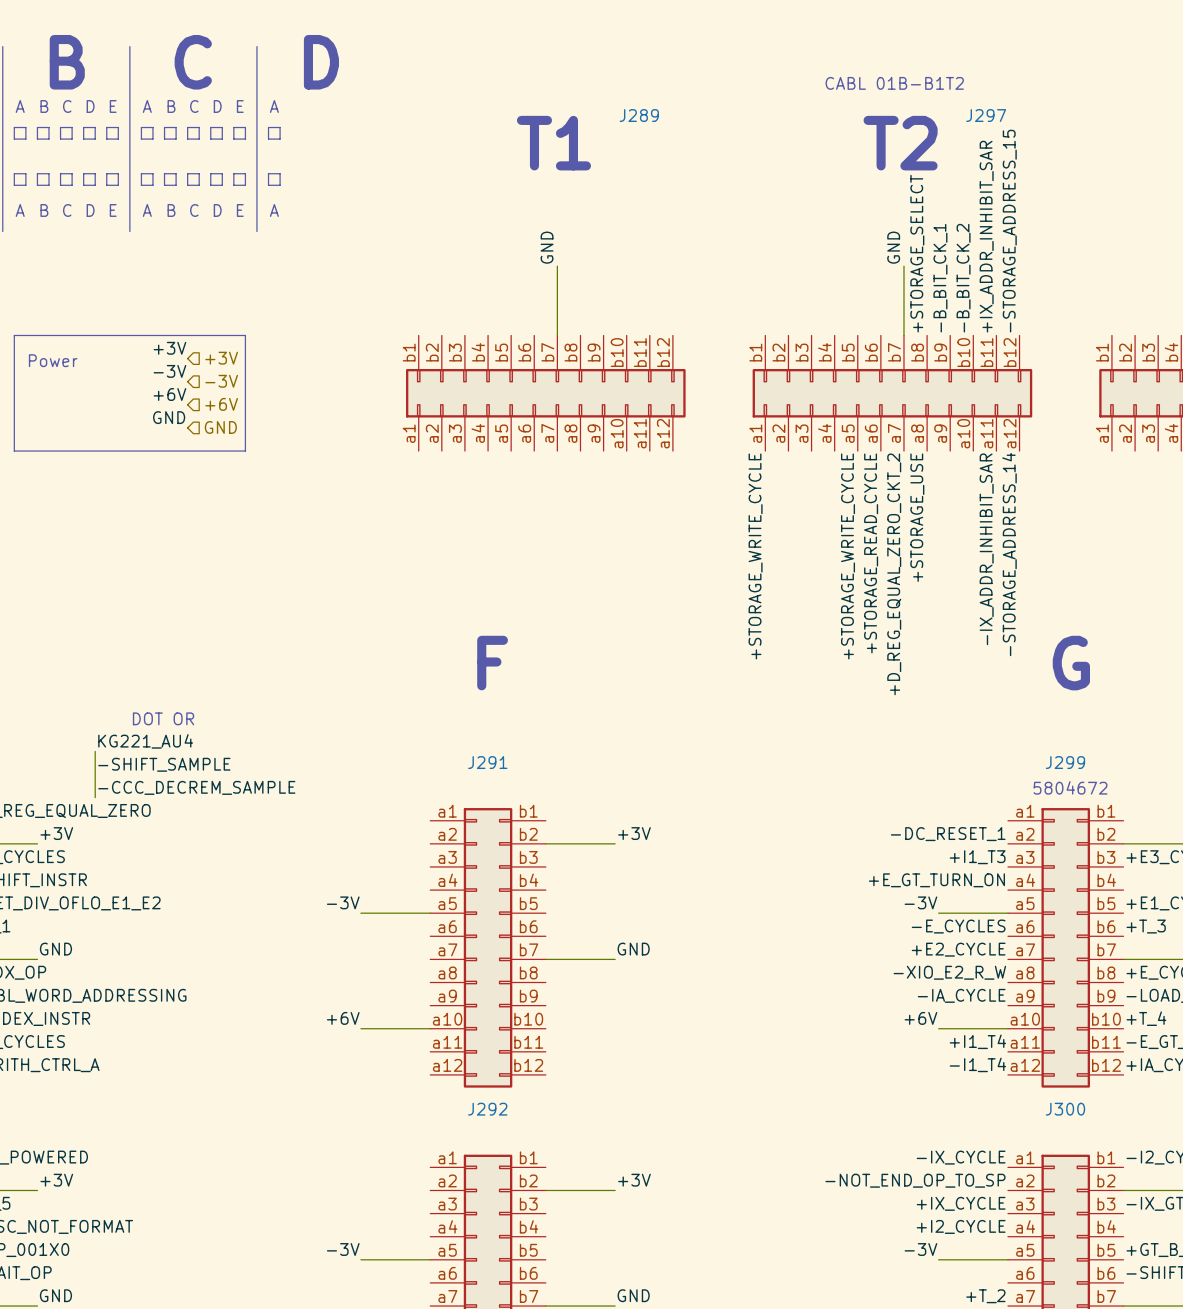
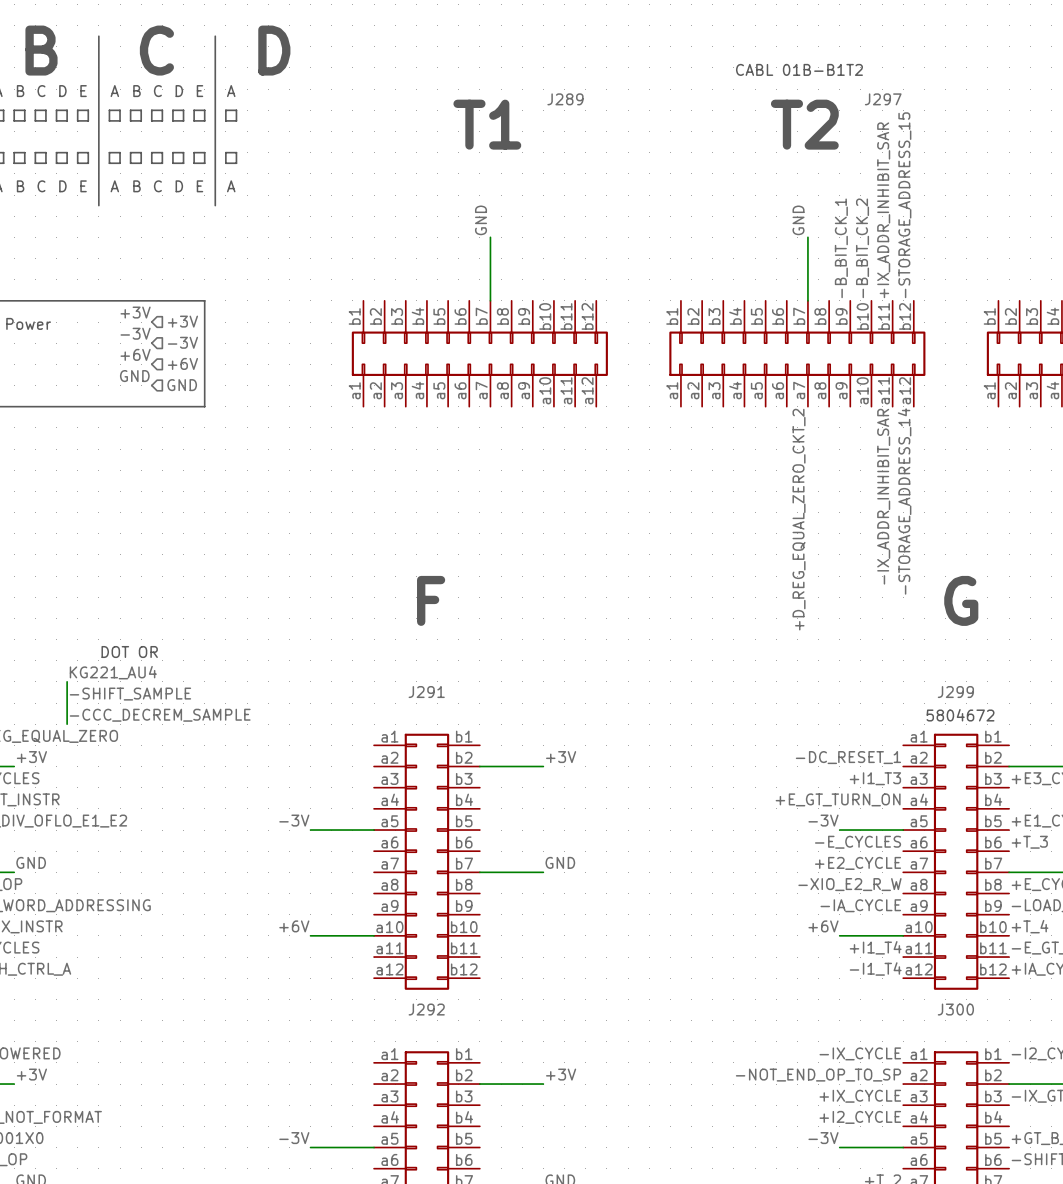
label: +STORAGE_SELECT (917, 253) -> none
label: +STORAGE_USE (917, 517) -> none
label: +STORAGE_READ_CYCLE (871, 553) -> none
label: +STORAGE_WRITE_CYCLE (755, 556) -> none
label: +STORAGE_WRITE_CYCLE (848, 556) -> none

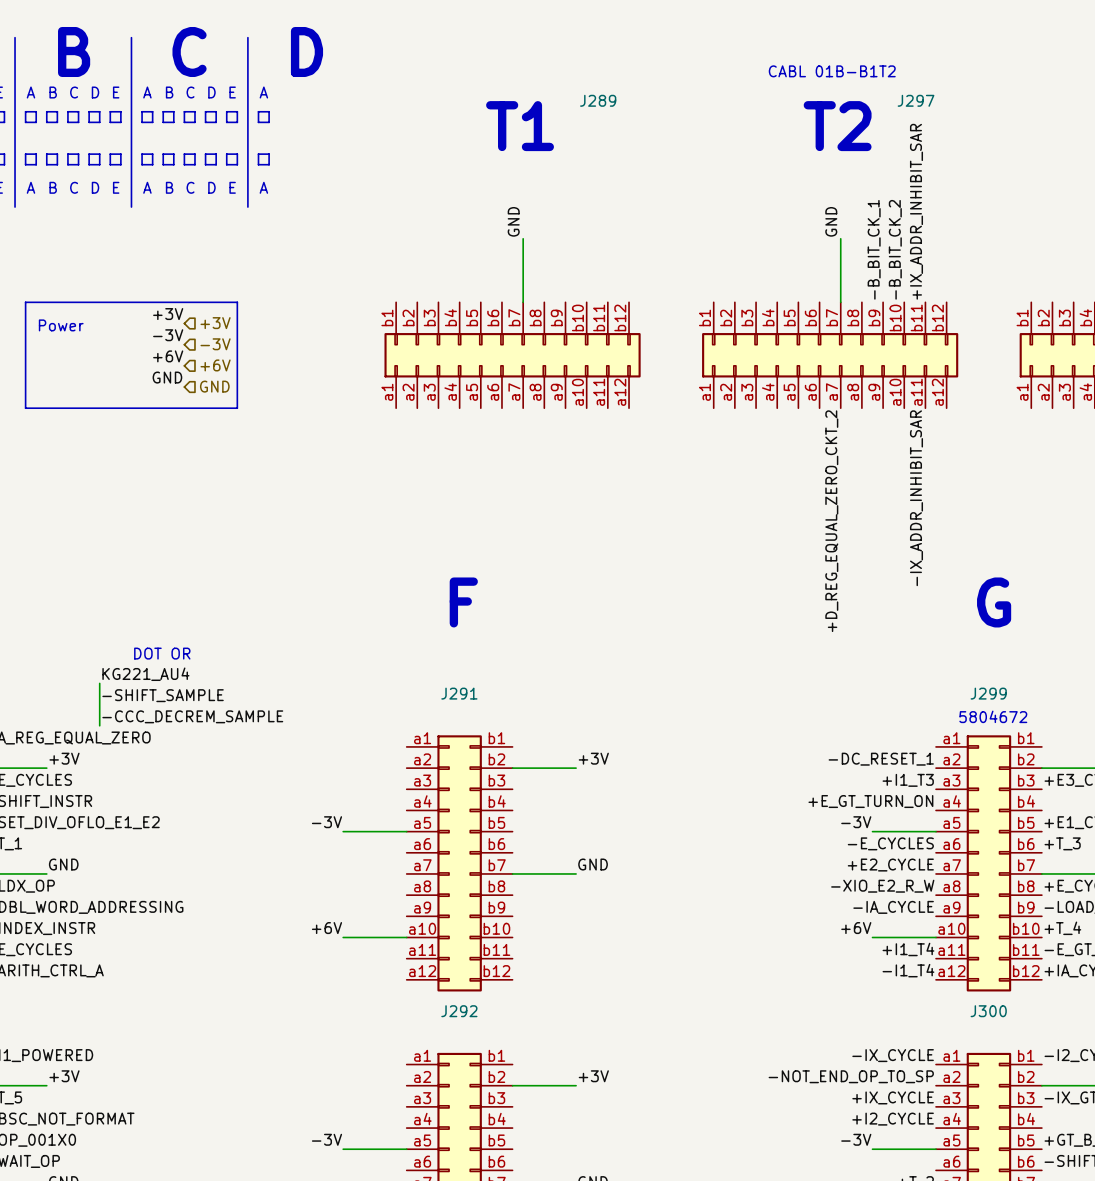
label: -STORAGE_ADDRESS_15 (904, 205) -> none
label: -STORAGE_ADDRESS_14 (904, 501) -> none

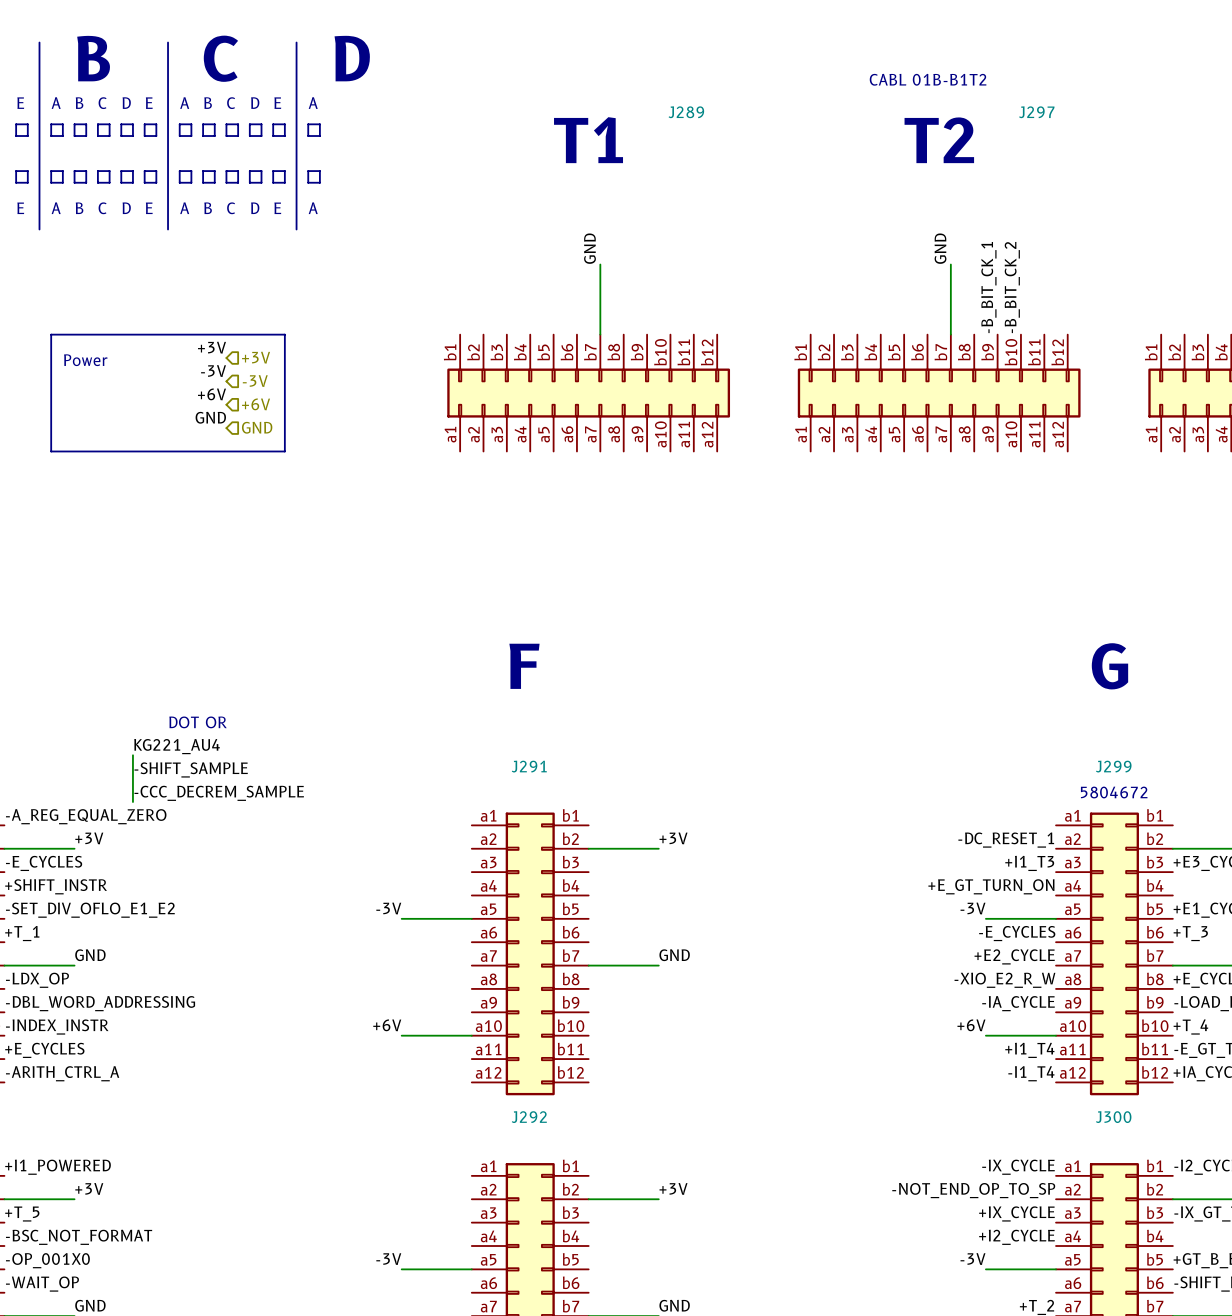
label: +IX_ADDR_INHIBIT_SAR (916, 211) -> none
label: -IX_ADDR_INHIBIT_SAR (916, 498) -> none
label: +D_REG_EQUAL_ZERO_CKT_2 (831, 521) -> none

